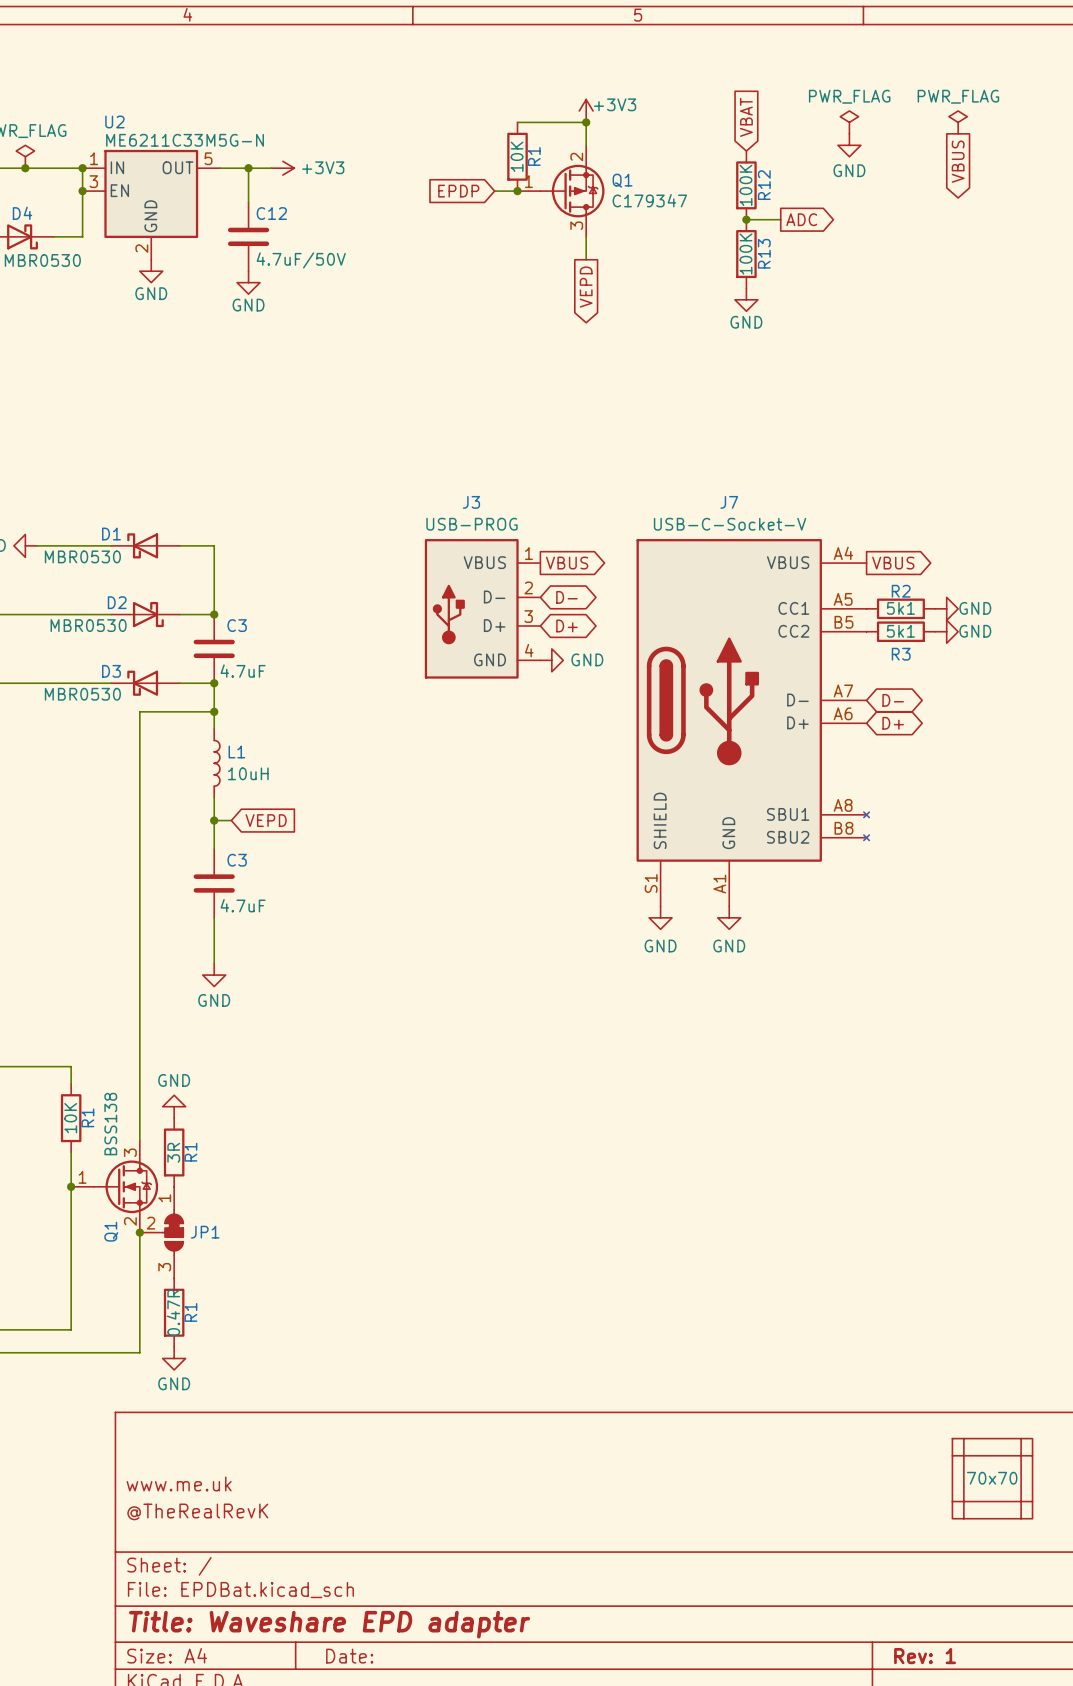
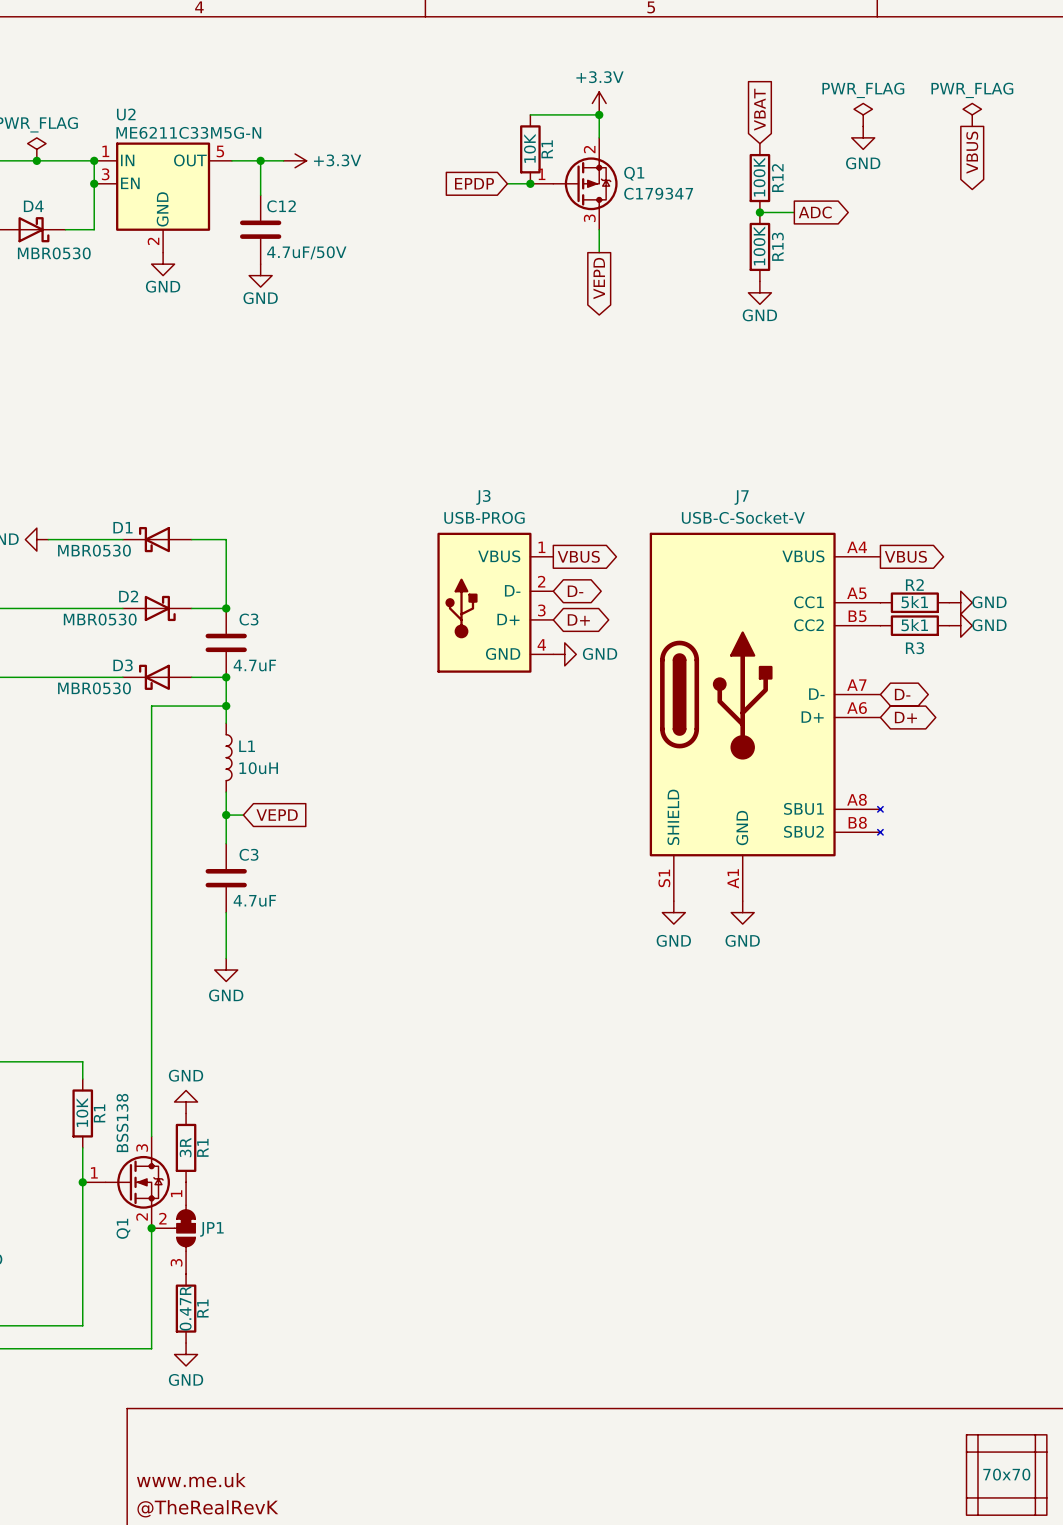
power symbol: +3V3 (586, 110) -> +3.3V (599, 103)
power symbol: +3V3 (282, 168) -> +3.3V (295, 160)

